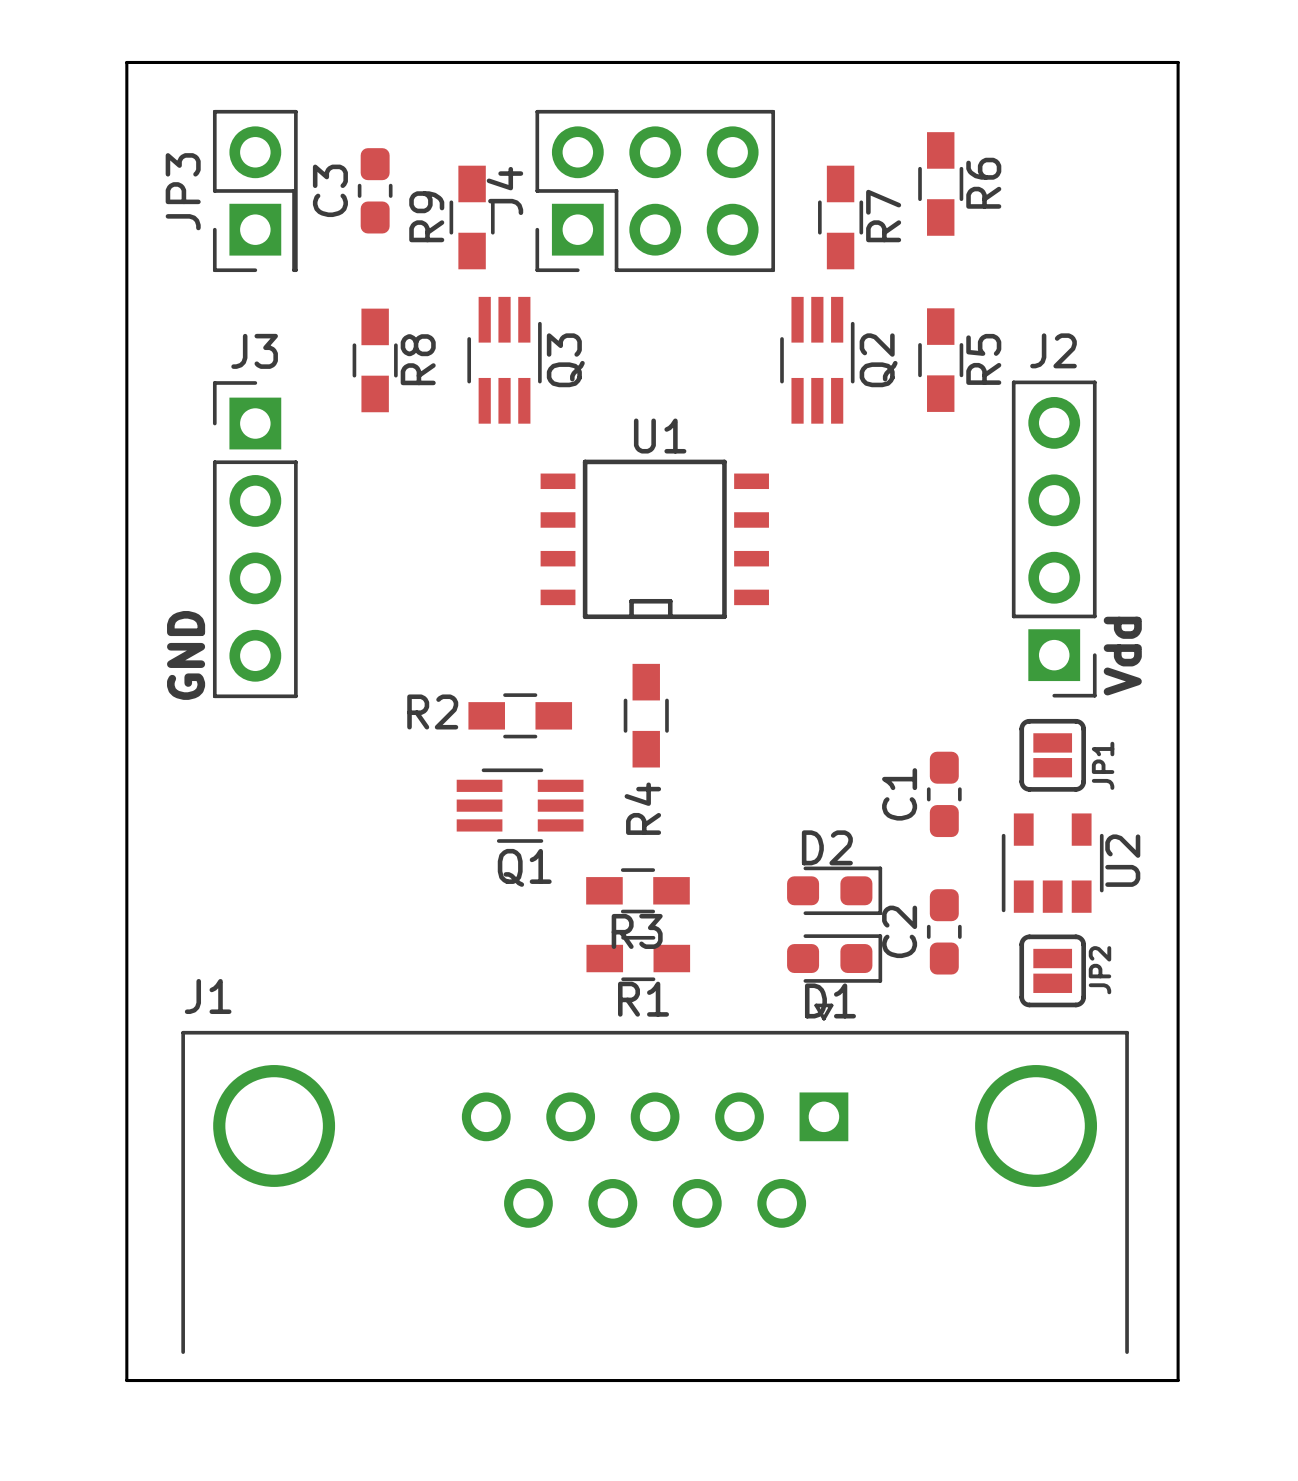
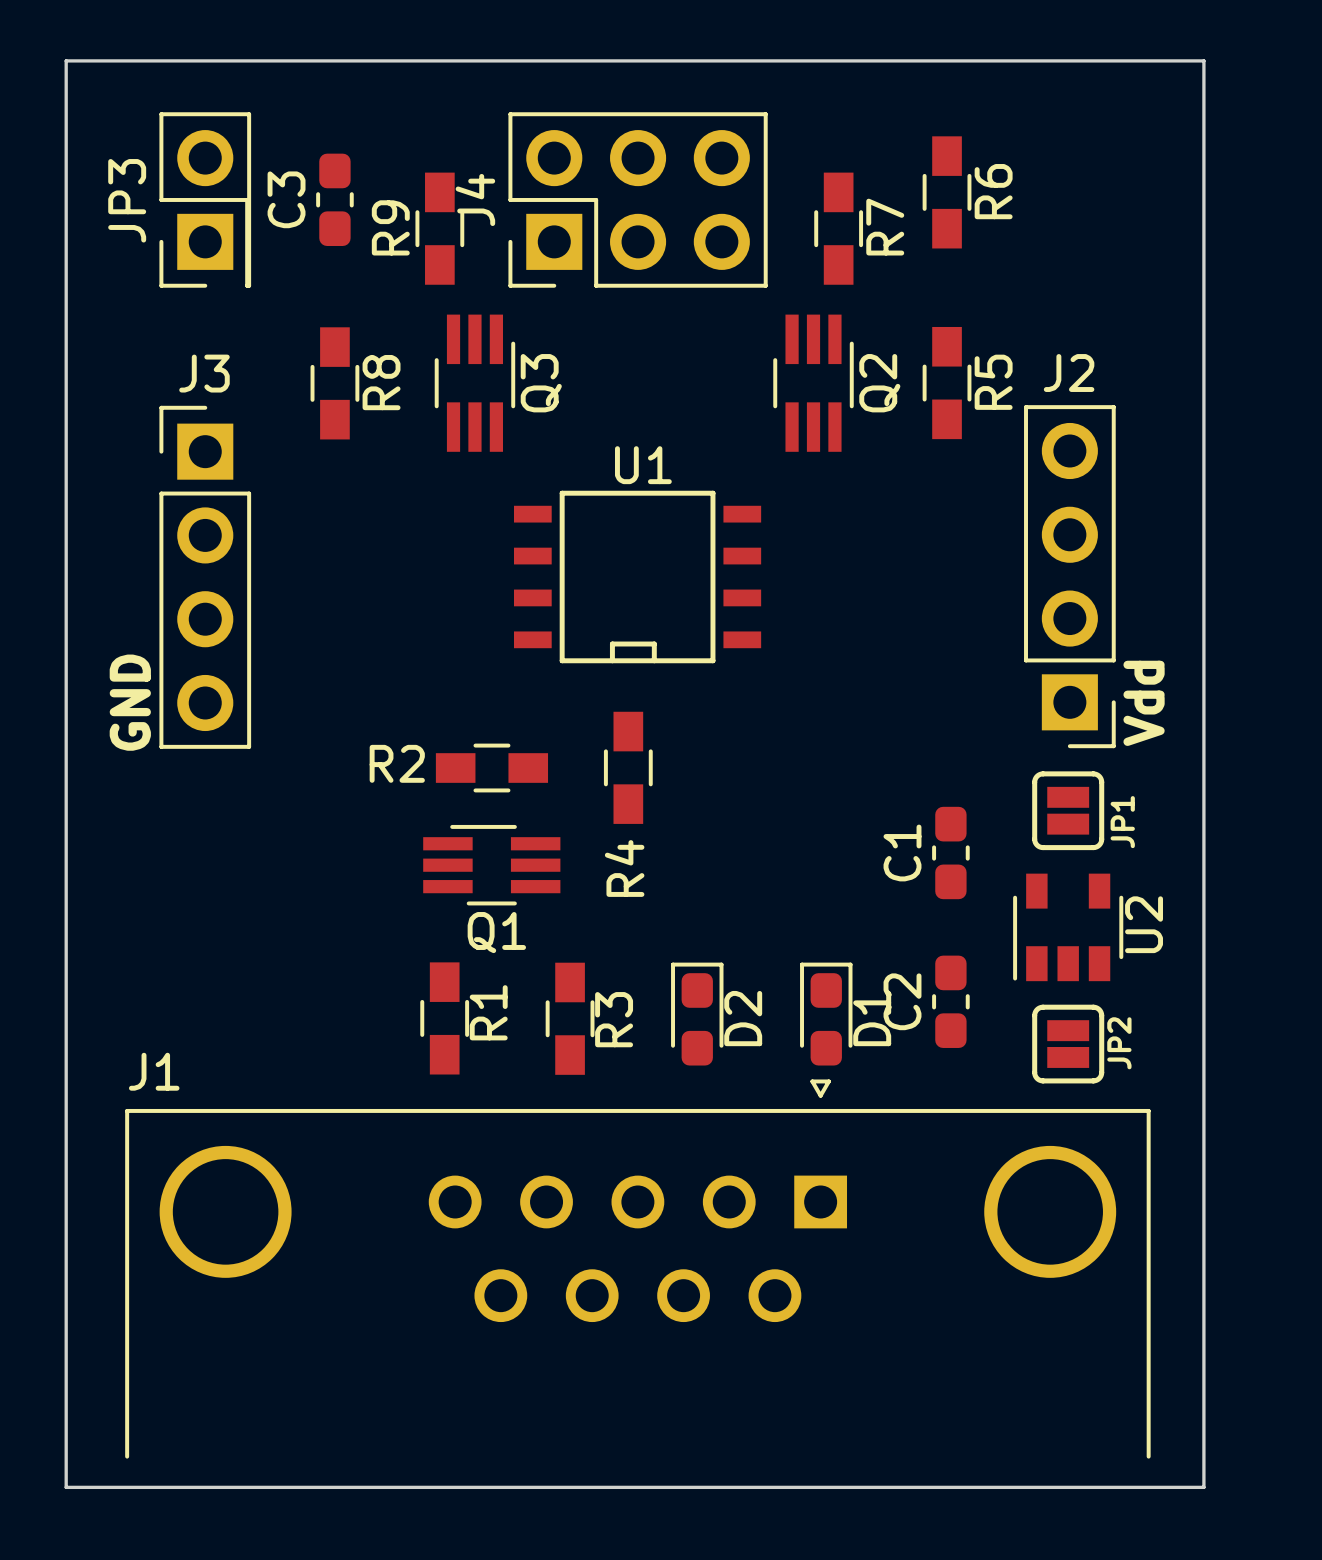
D2 name position: D2 (827, 847) -> D2 (743, 1018)
R3 rotation: 0° (637, 890) -> 90° clockwise (570, 1018)
R3 position: (637, 890) -> (570, 1018)
D2 rotation: 0° (834, 890) -> 90° counterclockwise (697, 1014)
D2 position: (834, 890) -> (697, 1014)
R1 rotation: 0° (638, 958) -> 90° clockwise (444, 1018)
R1 position: (638, 958) -> (444, 1018)
D1 rotation: 0° (834, 958) -> 90° counterclockwise (826, 1014)

